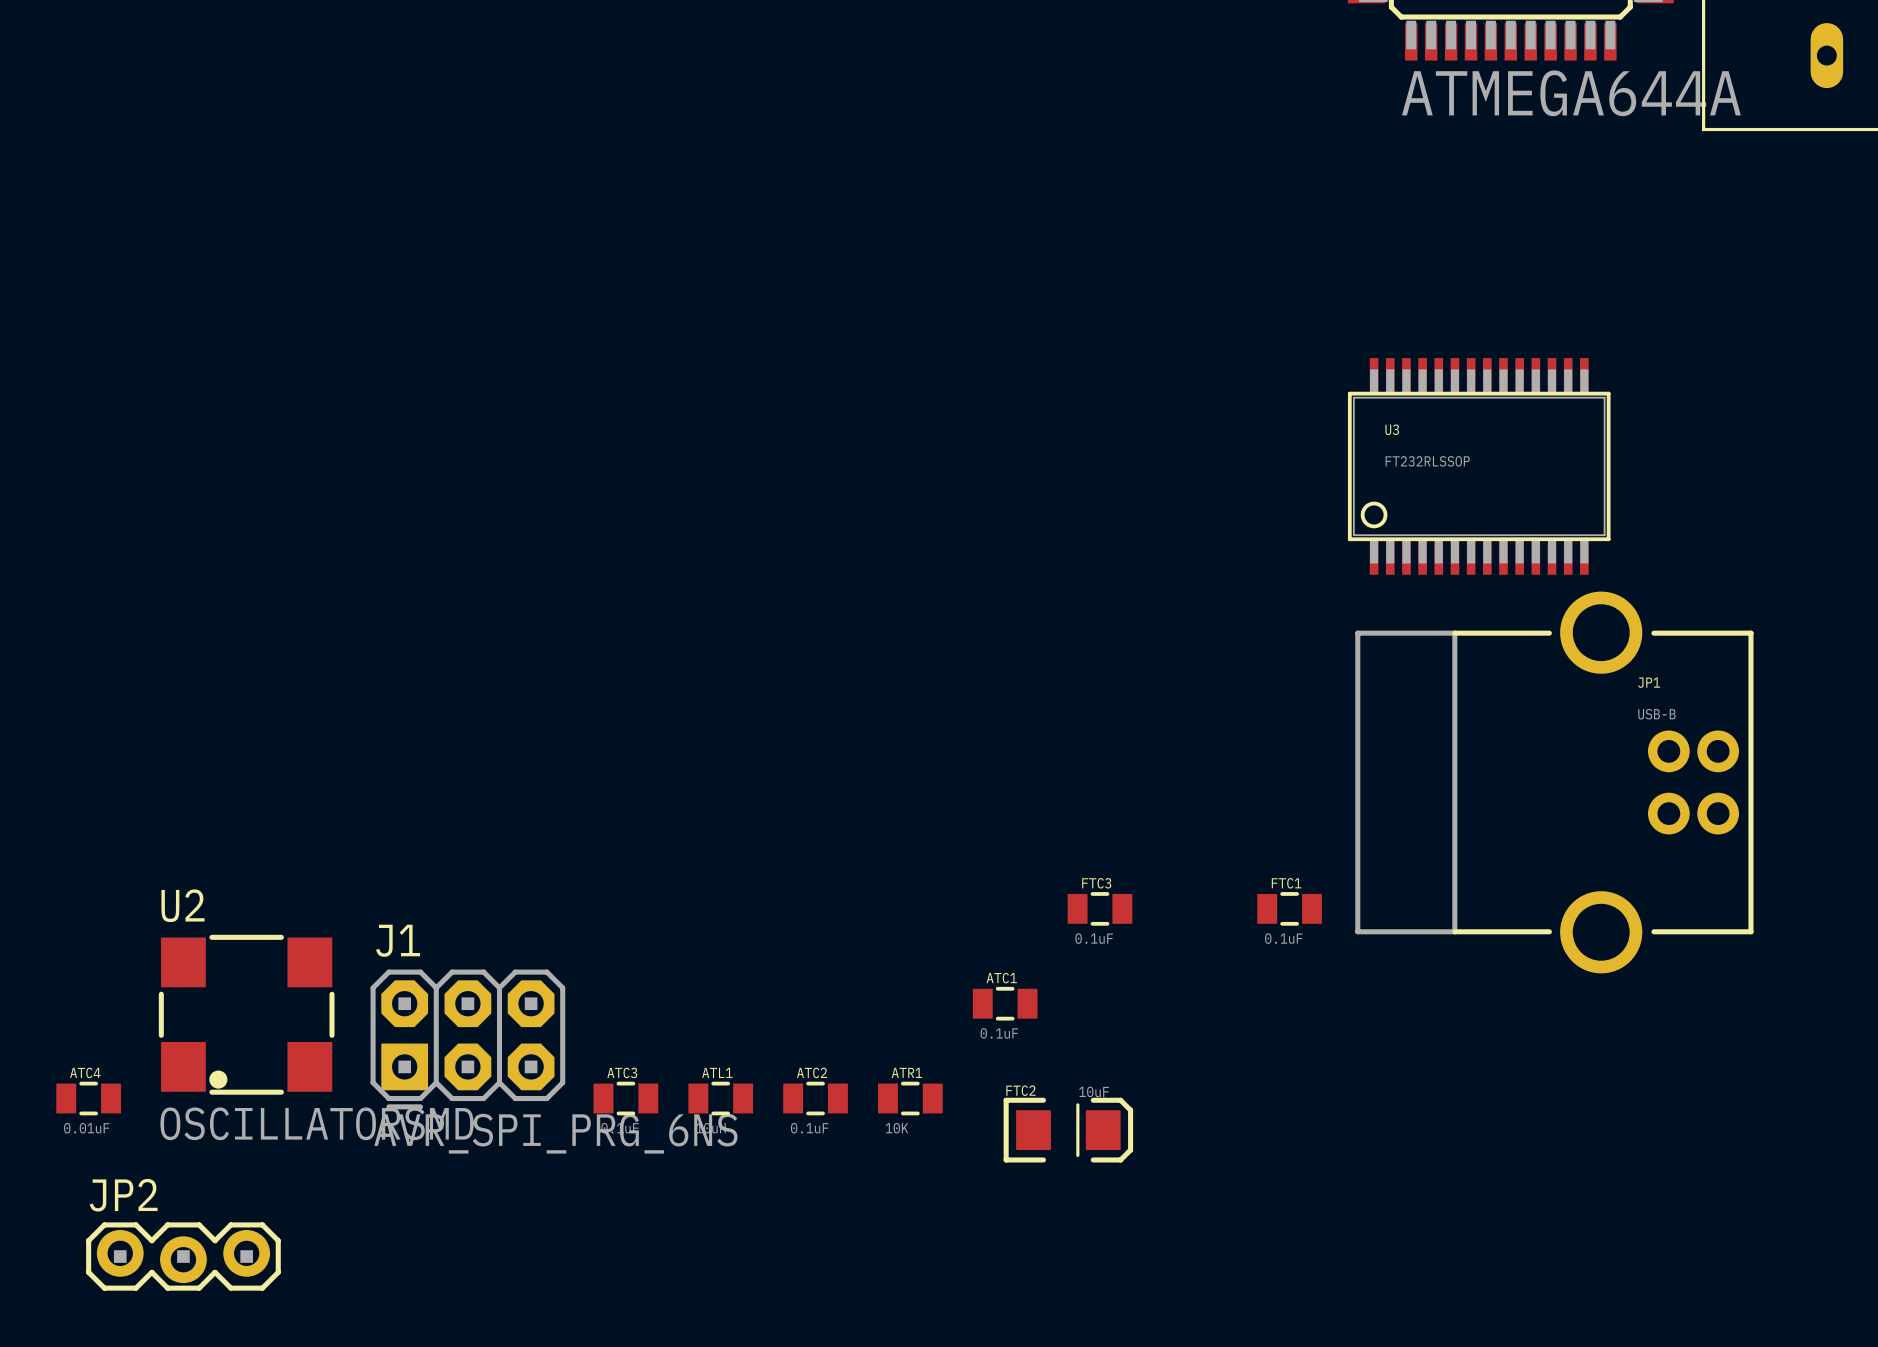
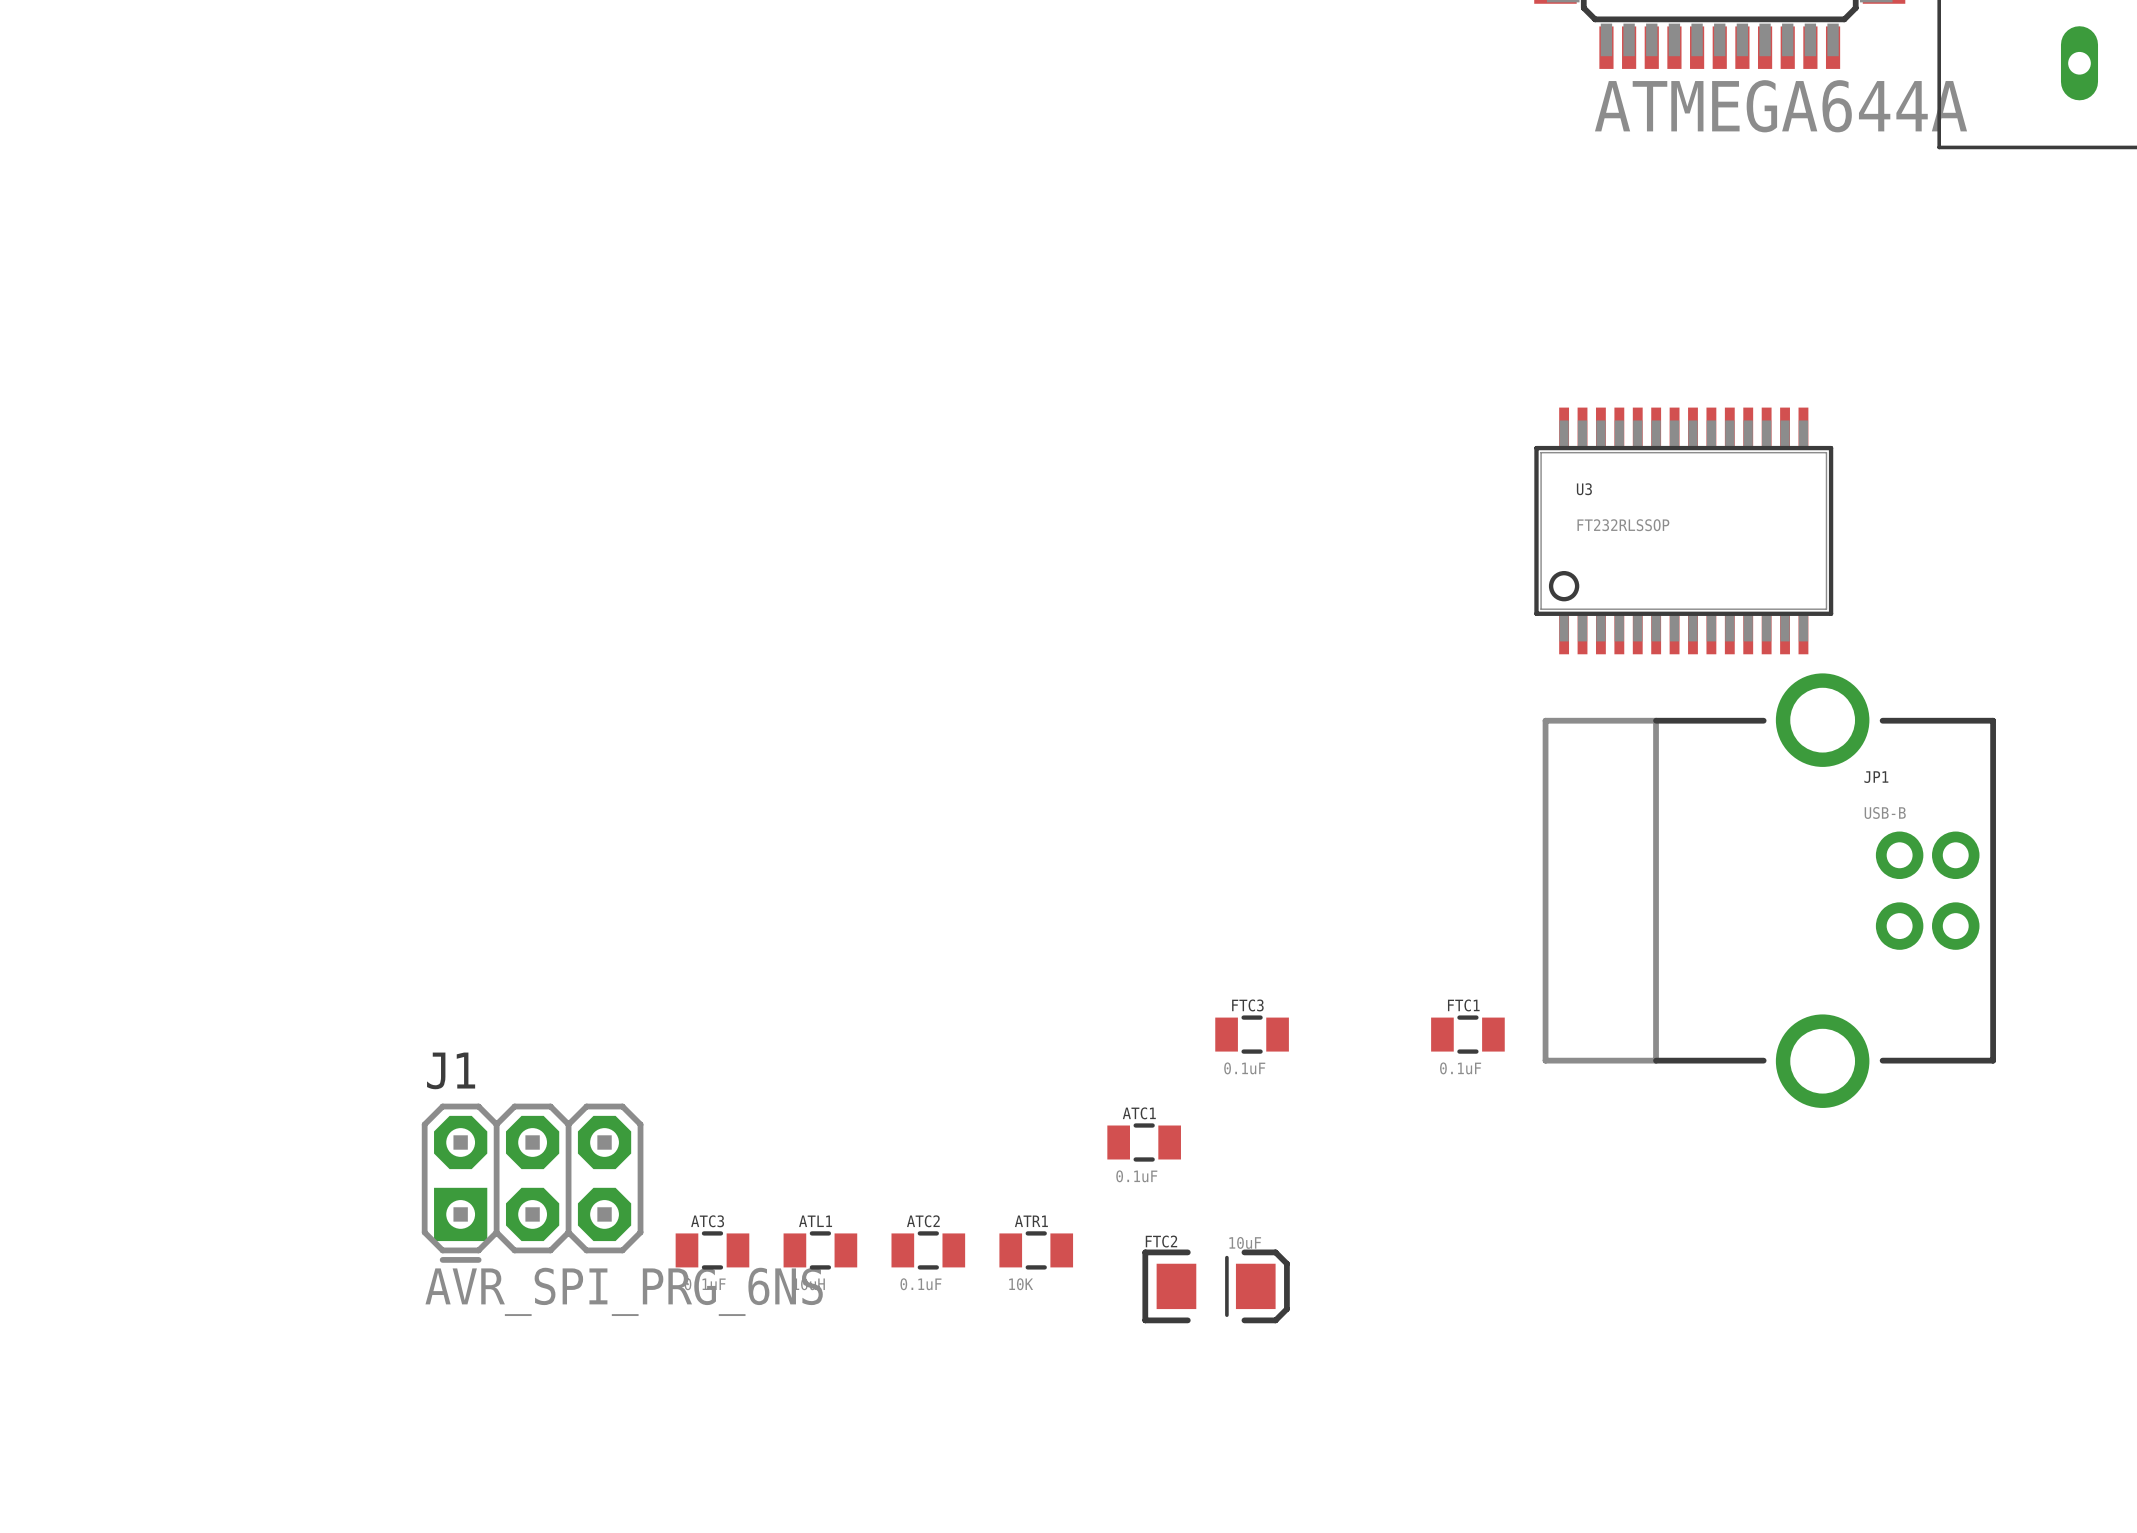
U2: OSCILLATORSMD (246, 1014) -> none
ATC4: 0.01uF (88, 1098) -> none
JP2: (183, 1256) -> none

